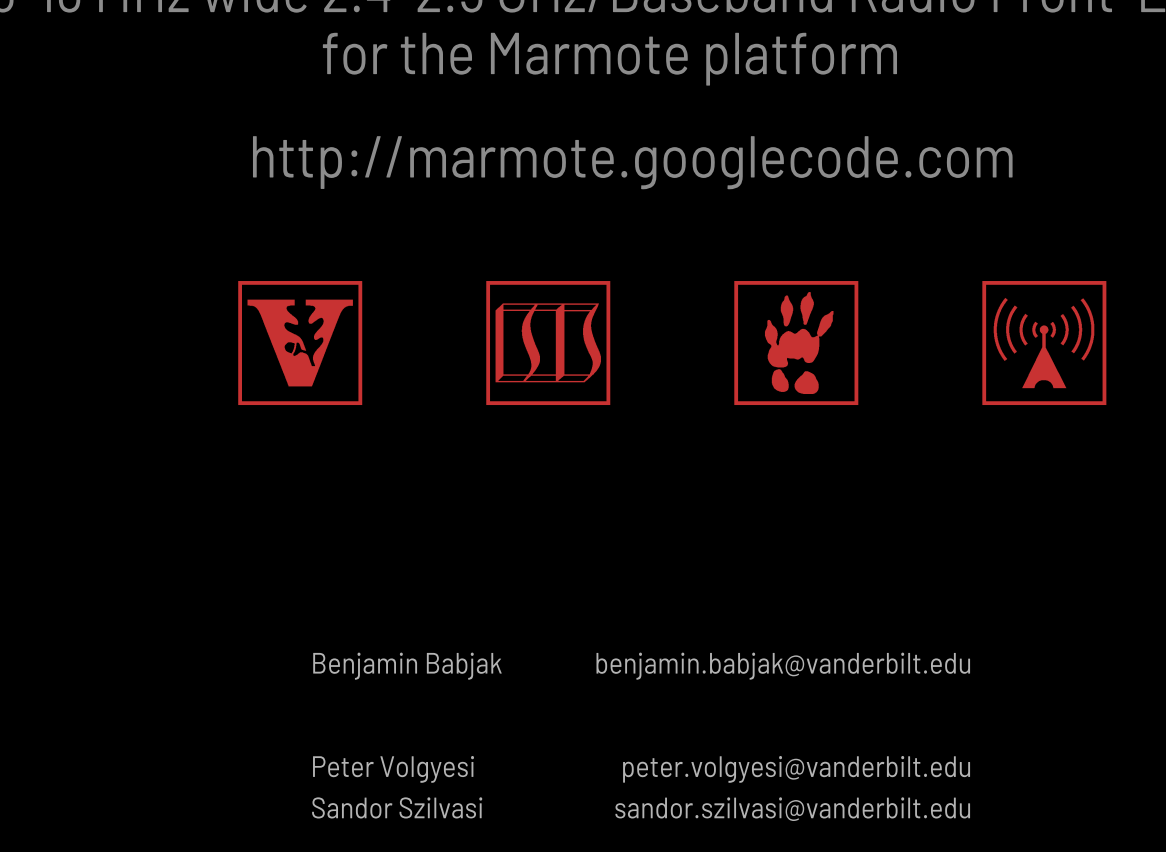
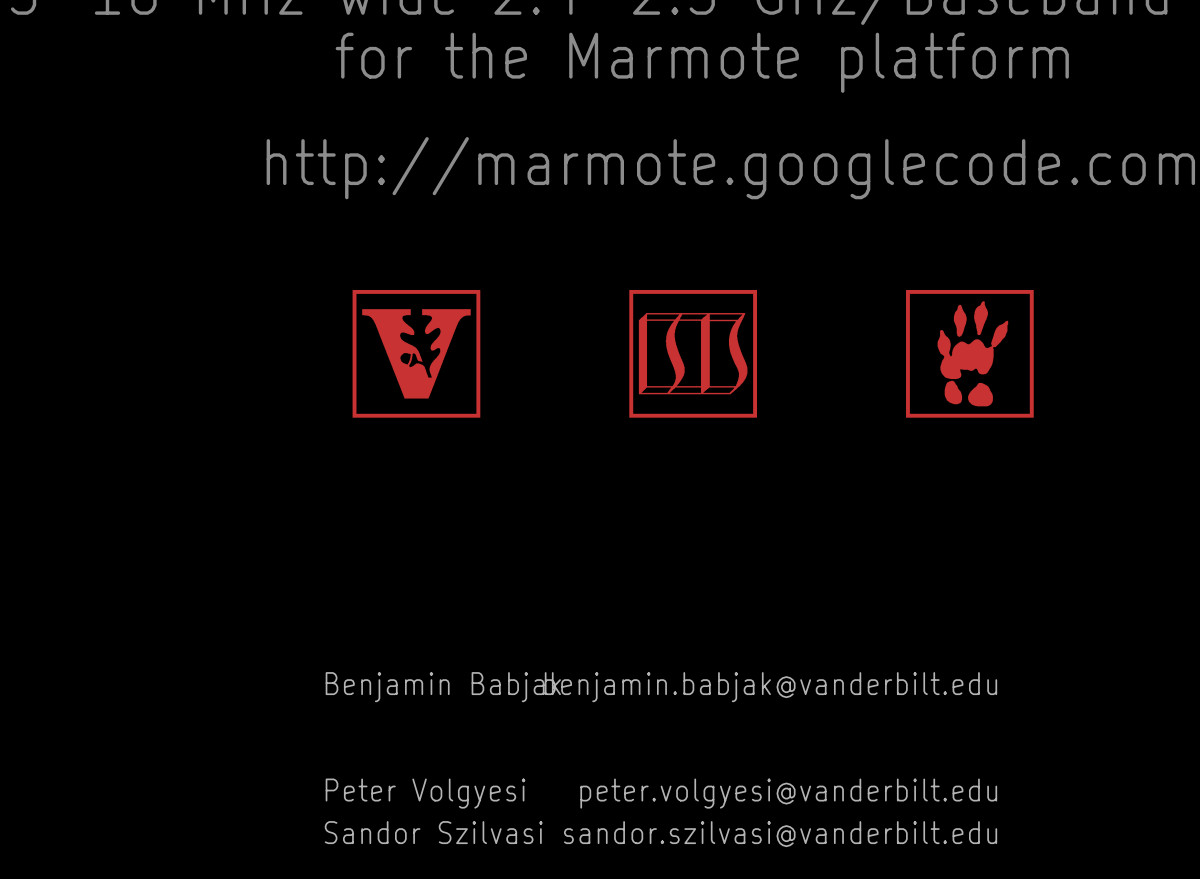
part position: (300, 343) -> (416, 353)
part position: (548, 343) -> (693, 353)
part position: (796, 343) -> (969, 353)
part: (1044, 343) -> none

